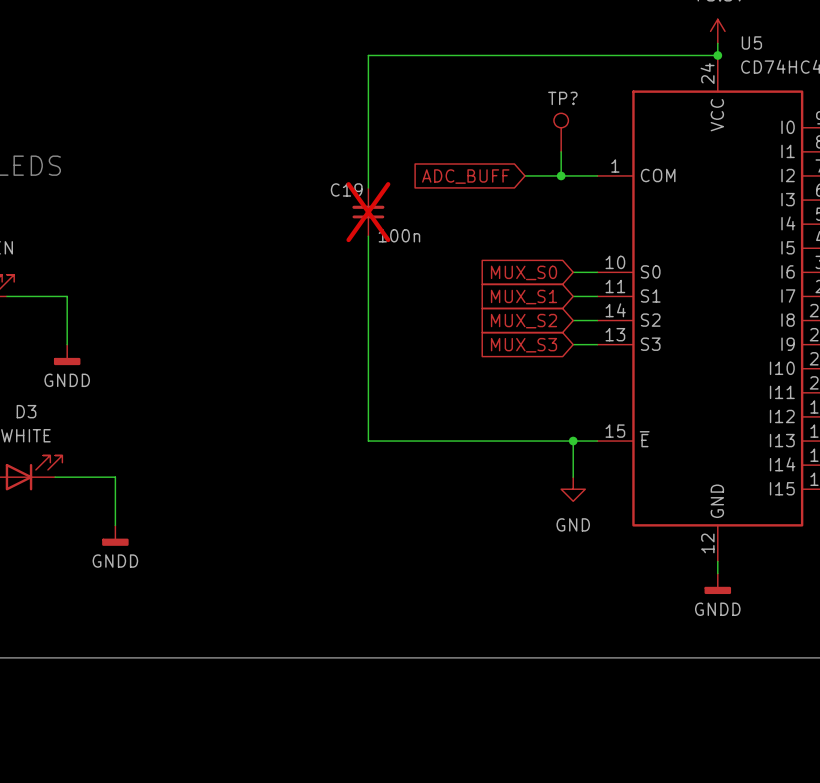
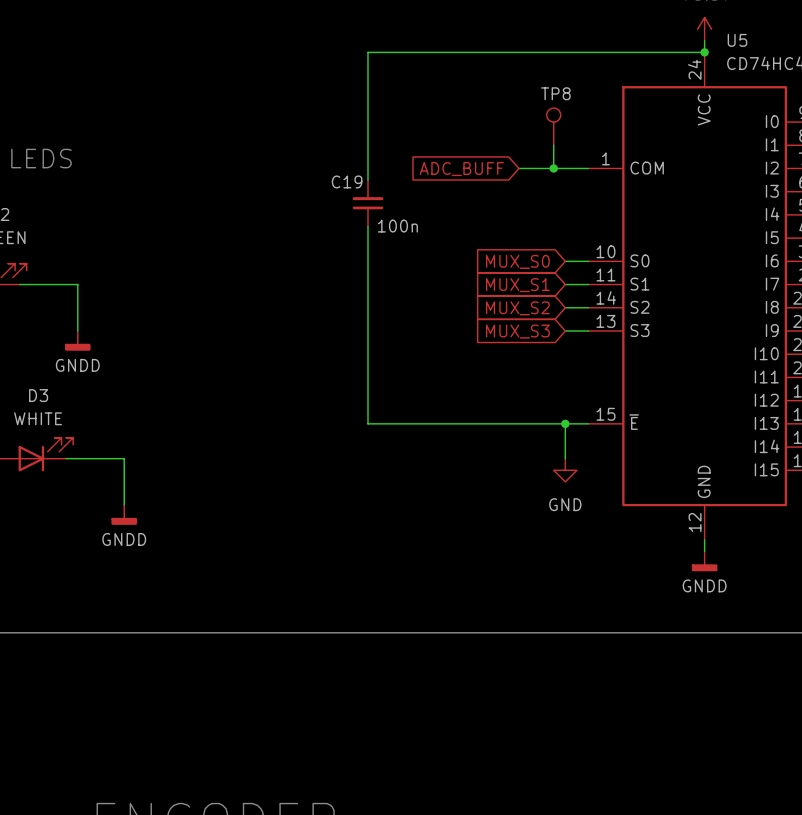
TP? name: TP? (562, 98) -> TP8 (555, 93)
C19 do-not-place cross: (368, 212) -> none

